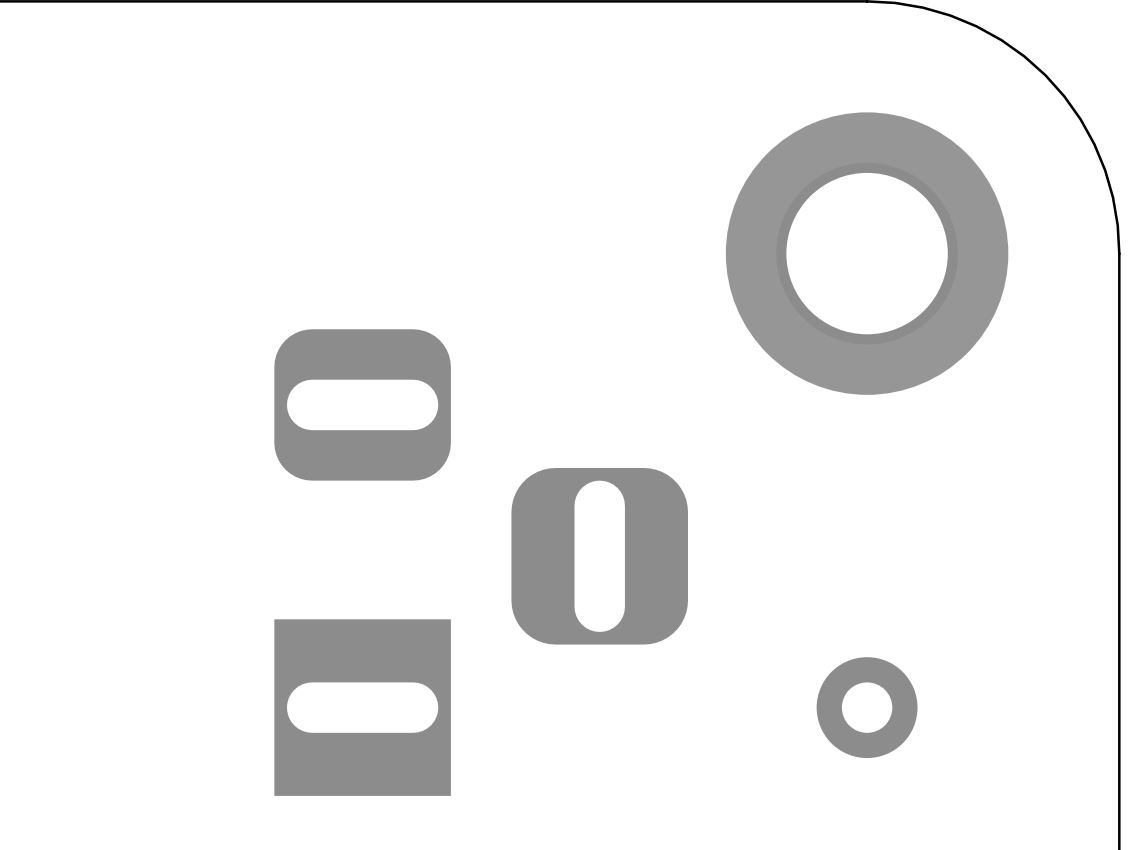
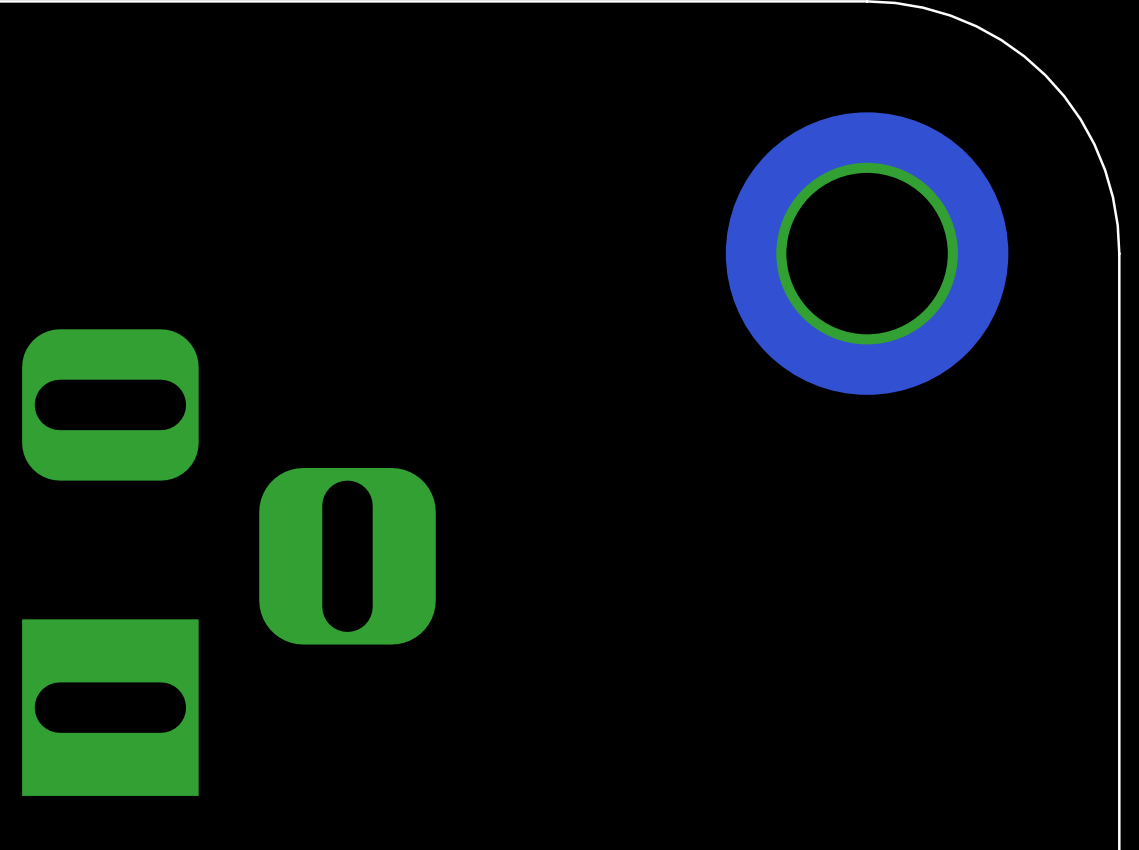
part position: (481, 562) -> (228, 562)
part: (867, 707) -> none

